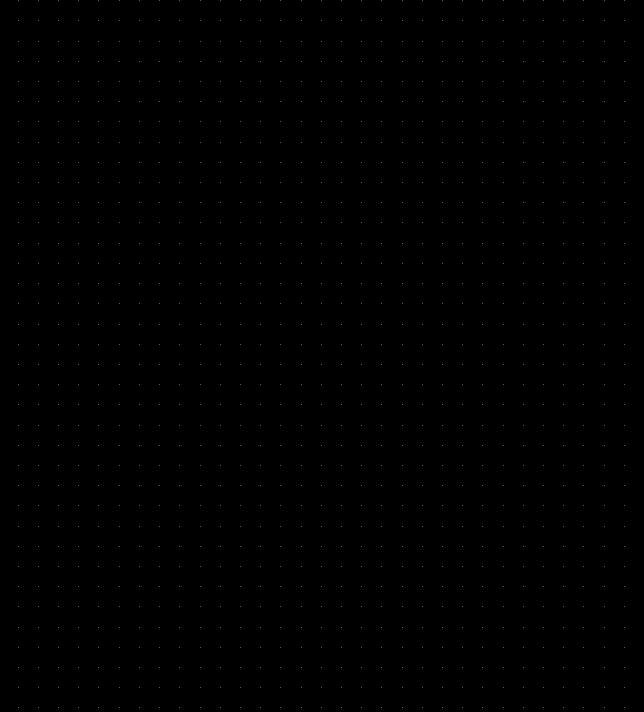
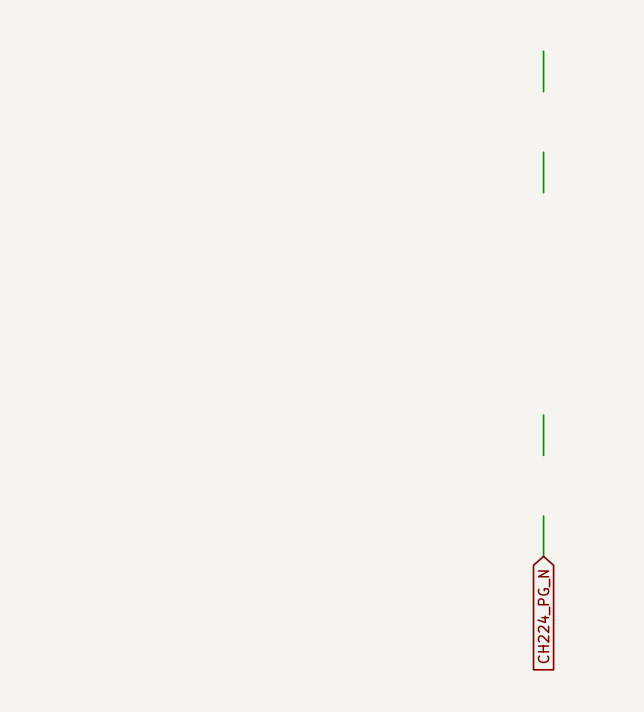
wire: none -> (543, 51) (543, 91)
wire: none -> (543, 152) (543, 192)
wire: none -> (543, 414) (543, 455)
wire: none -> (543, 516) (543, 556)
global label: none -> CH224_PG_N (543, 616)

